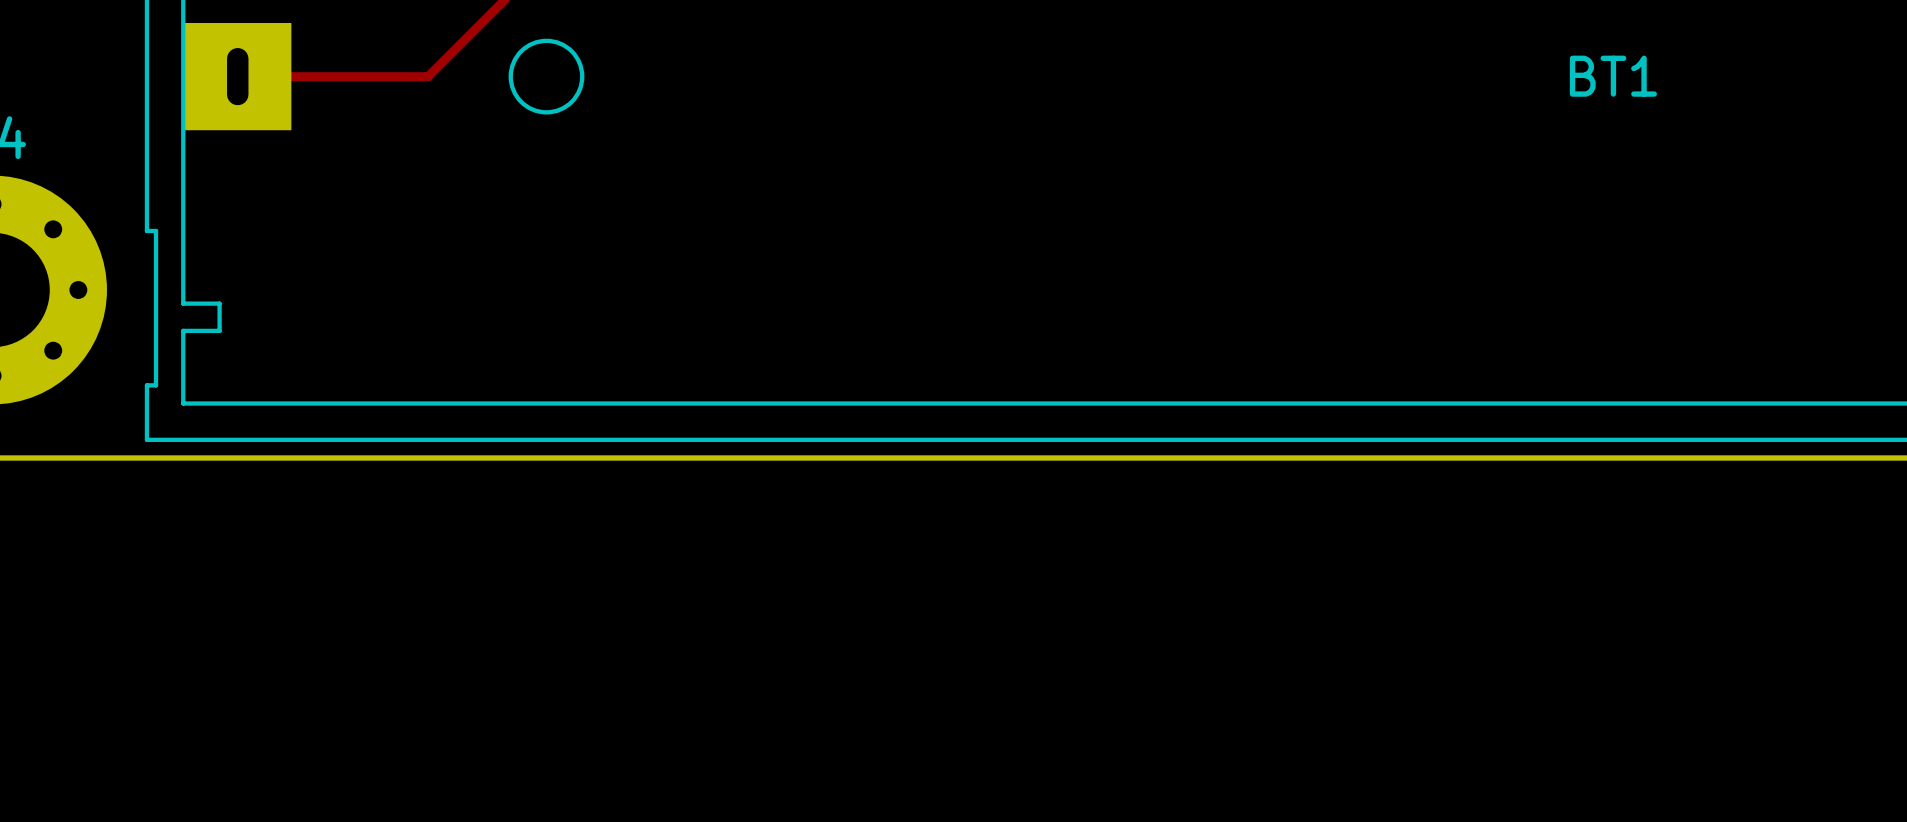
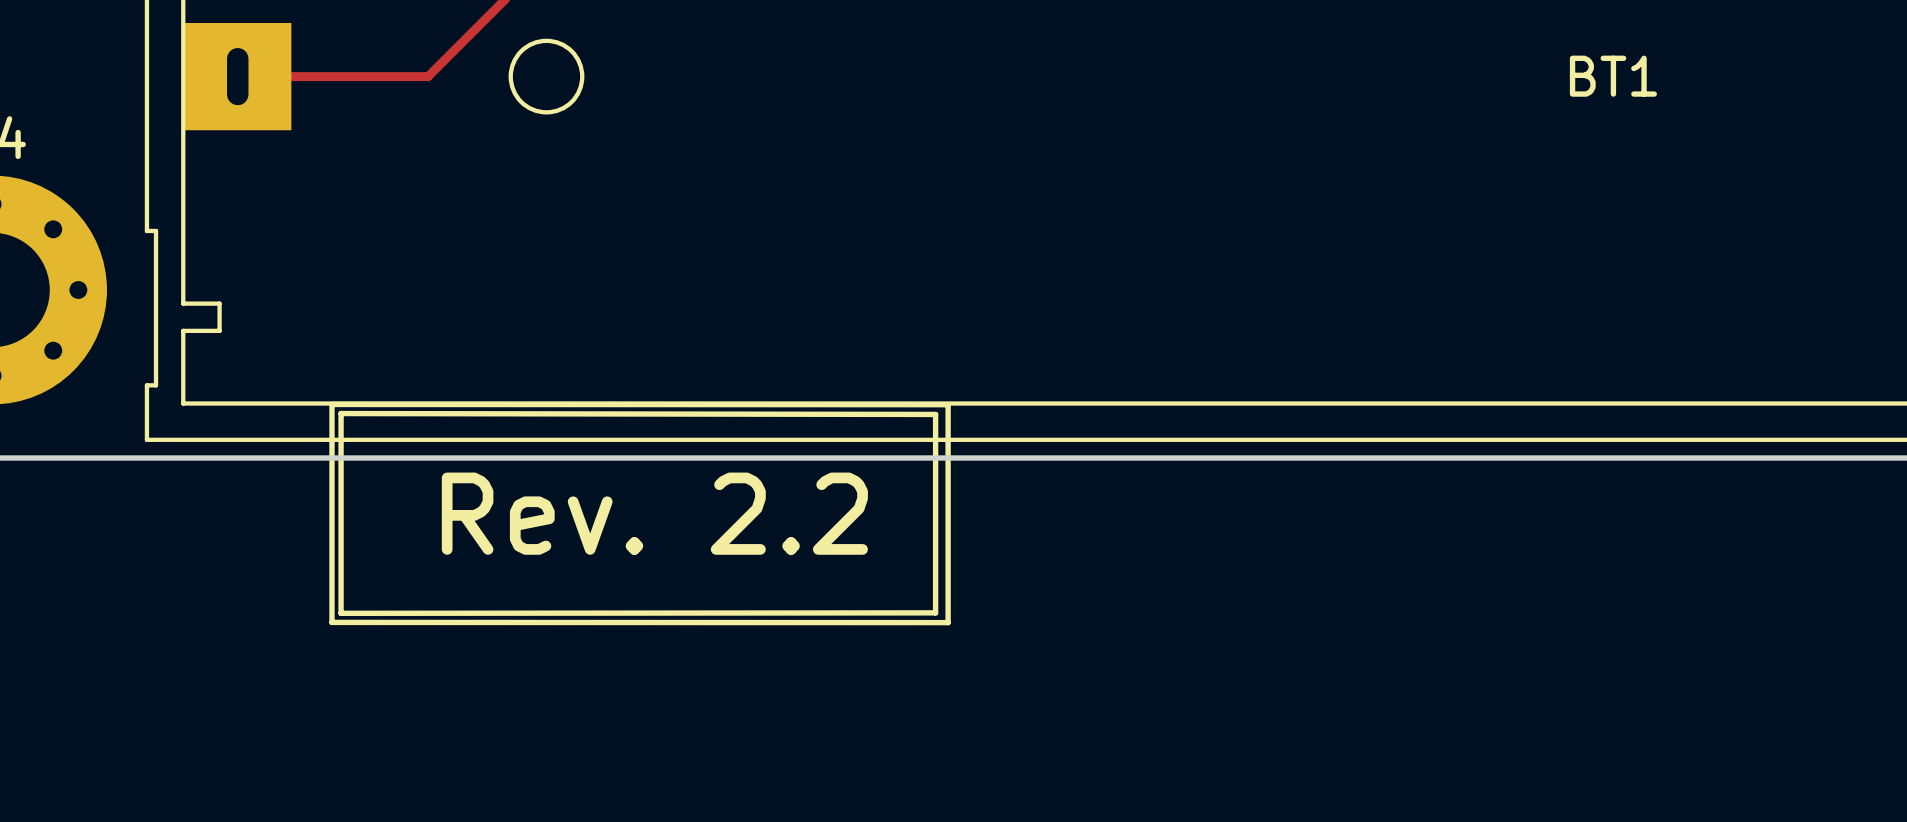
line: none -> (331, 404) (948, 404) (948, 622) (331, 622) (331, 404)
line: none -> (341, 413) (341, 613) (935, 612) (935, 414) (341, 413)
text: none -> Rev. 2.2 (654, 513)

